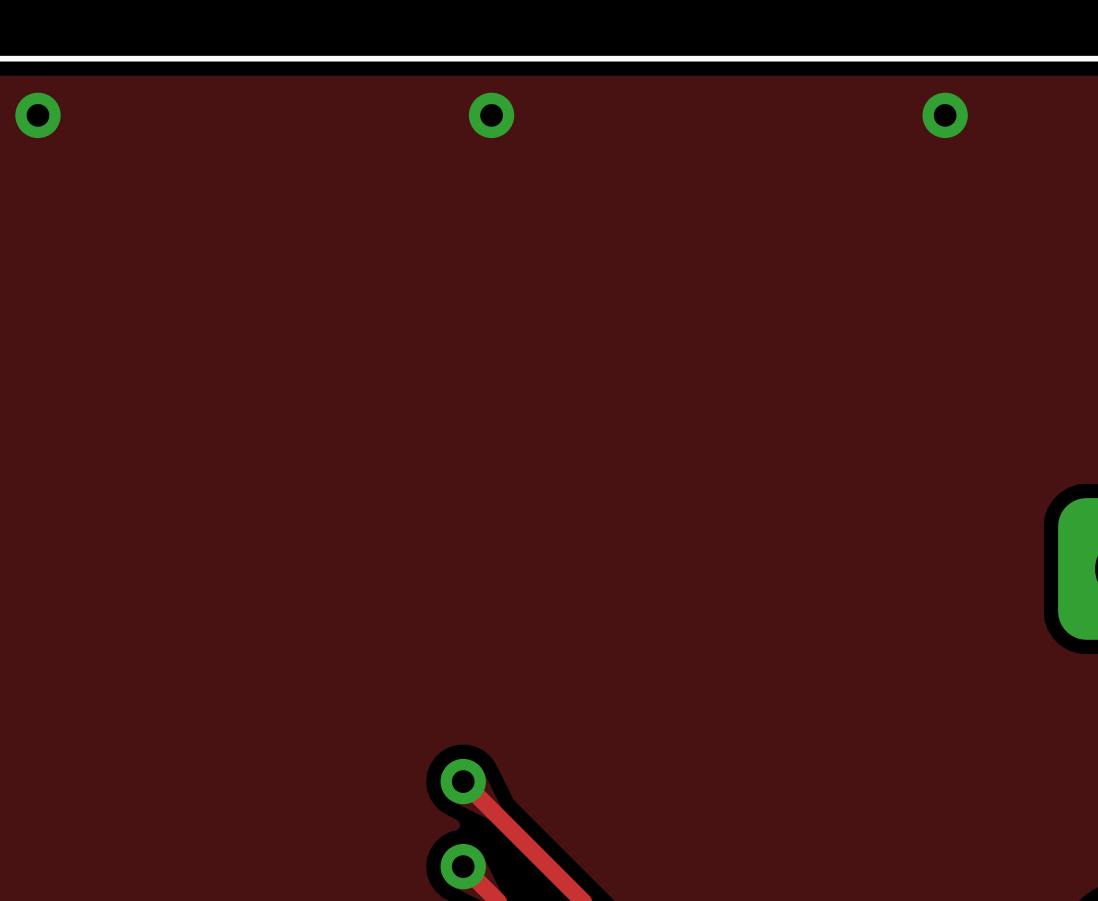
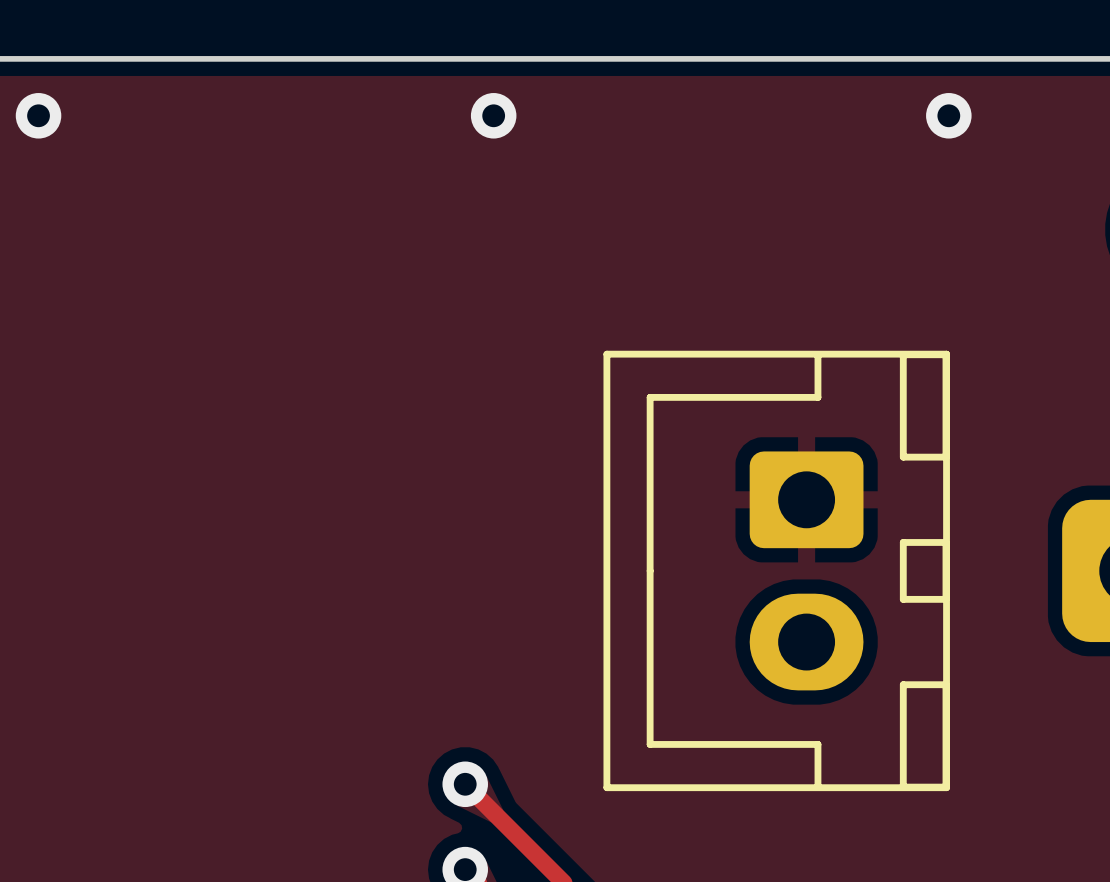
part: none -> (776, 570)

